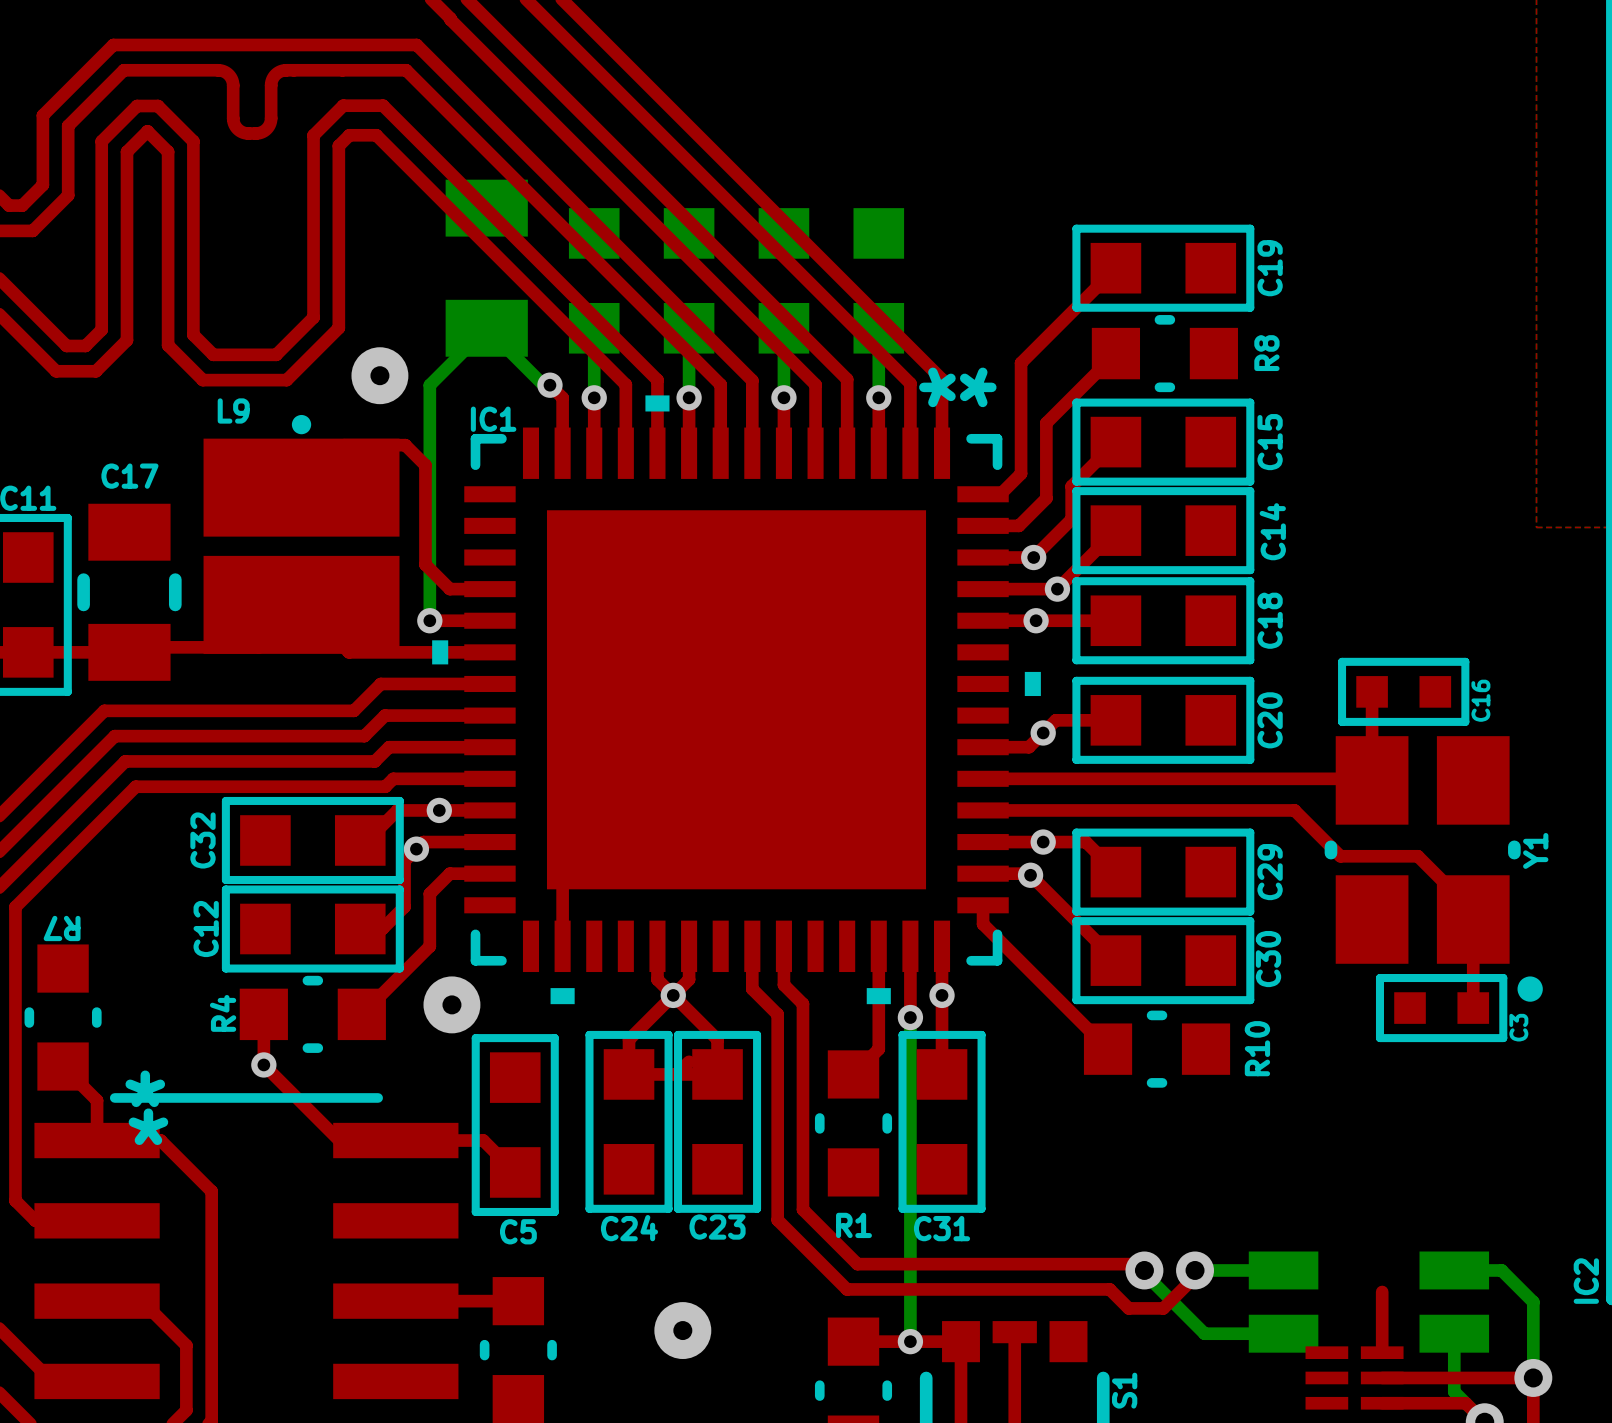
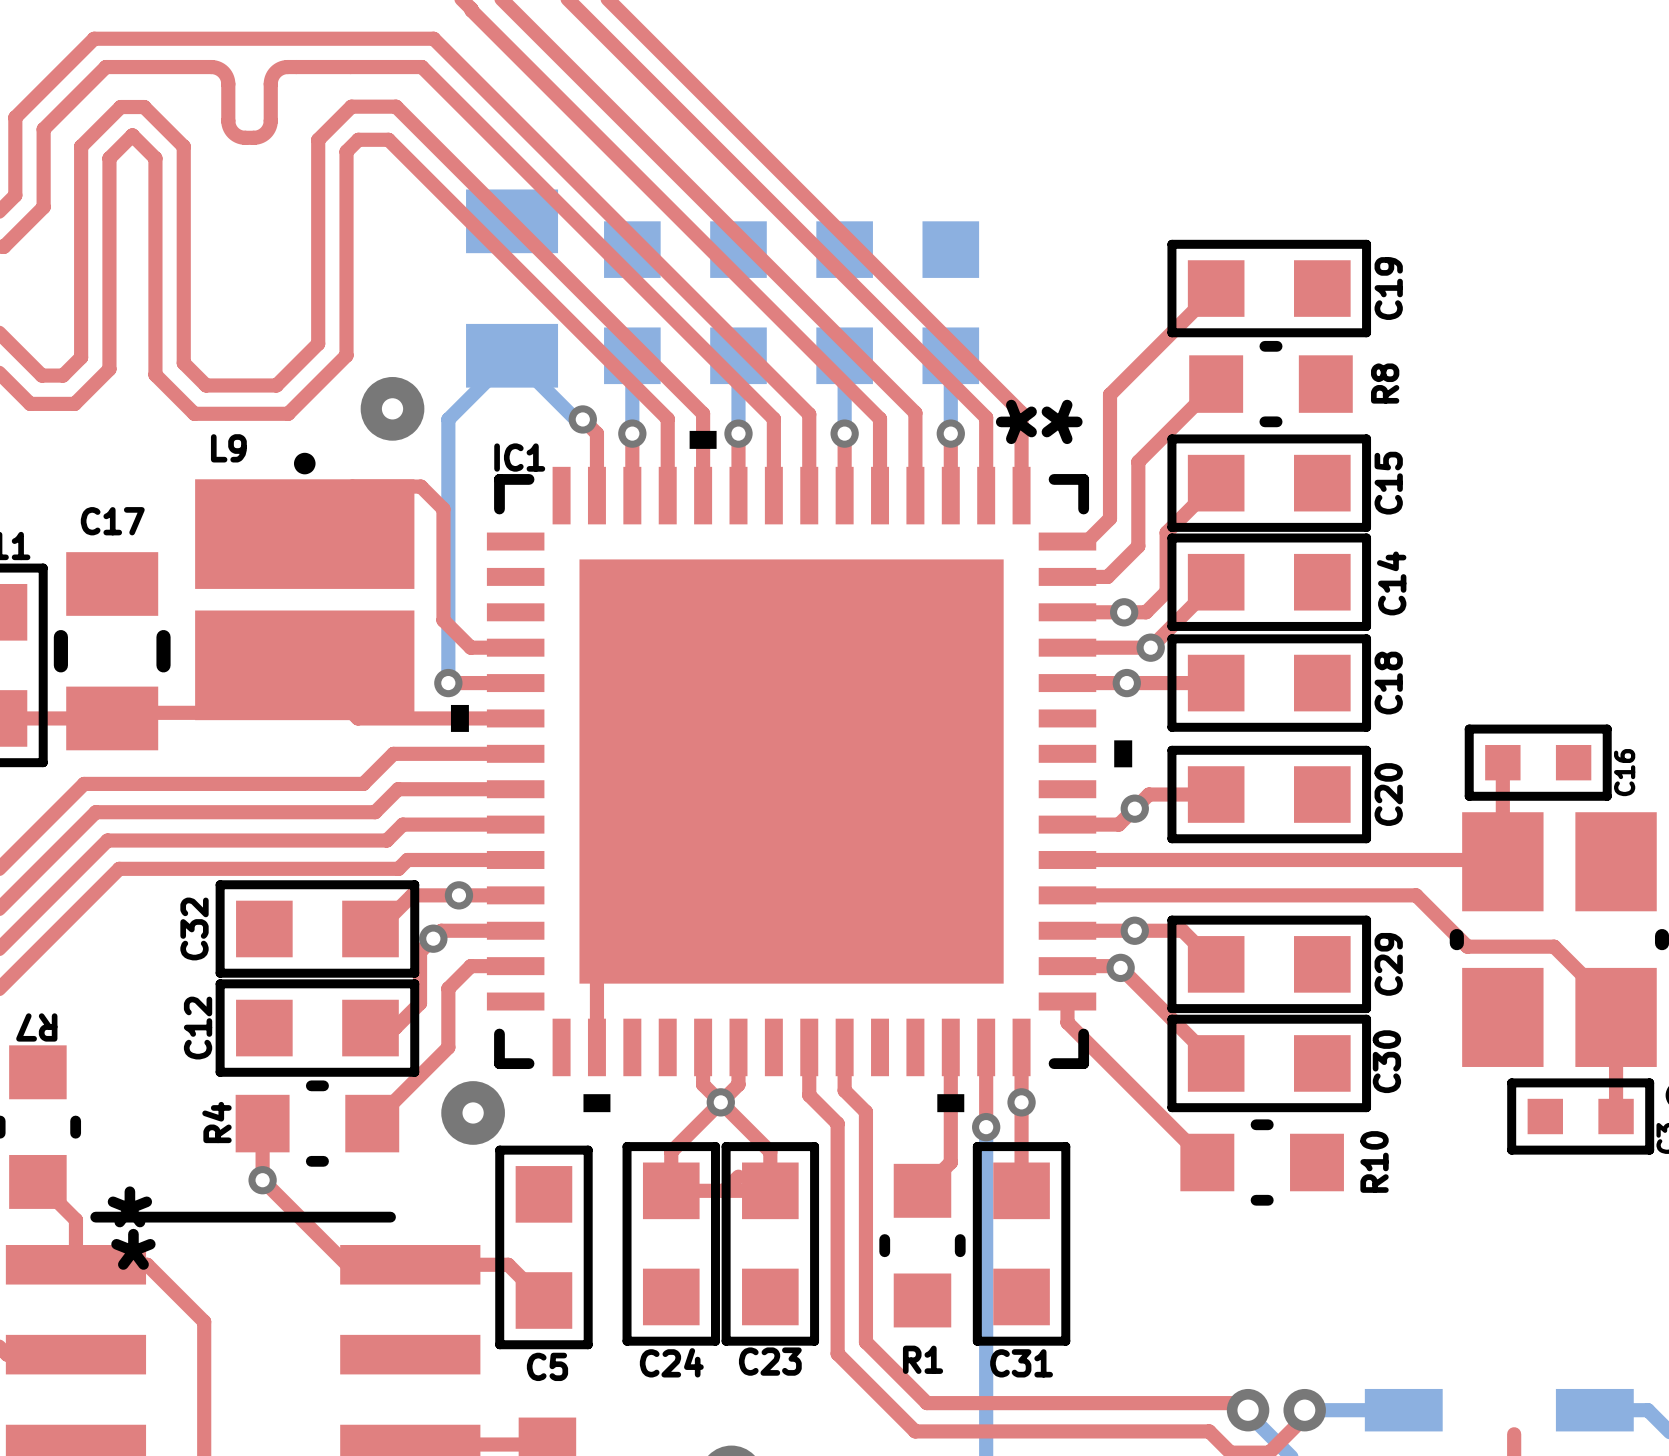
top track: (1071, 519) (1033, 557) -> (1166, 569) (1166, 591) (1146, 612) (1124, 612)

